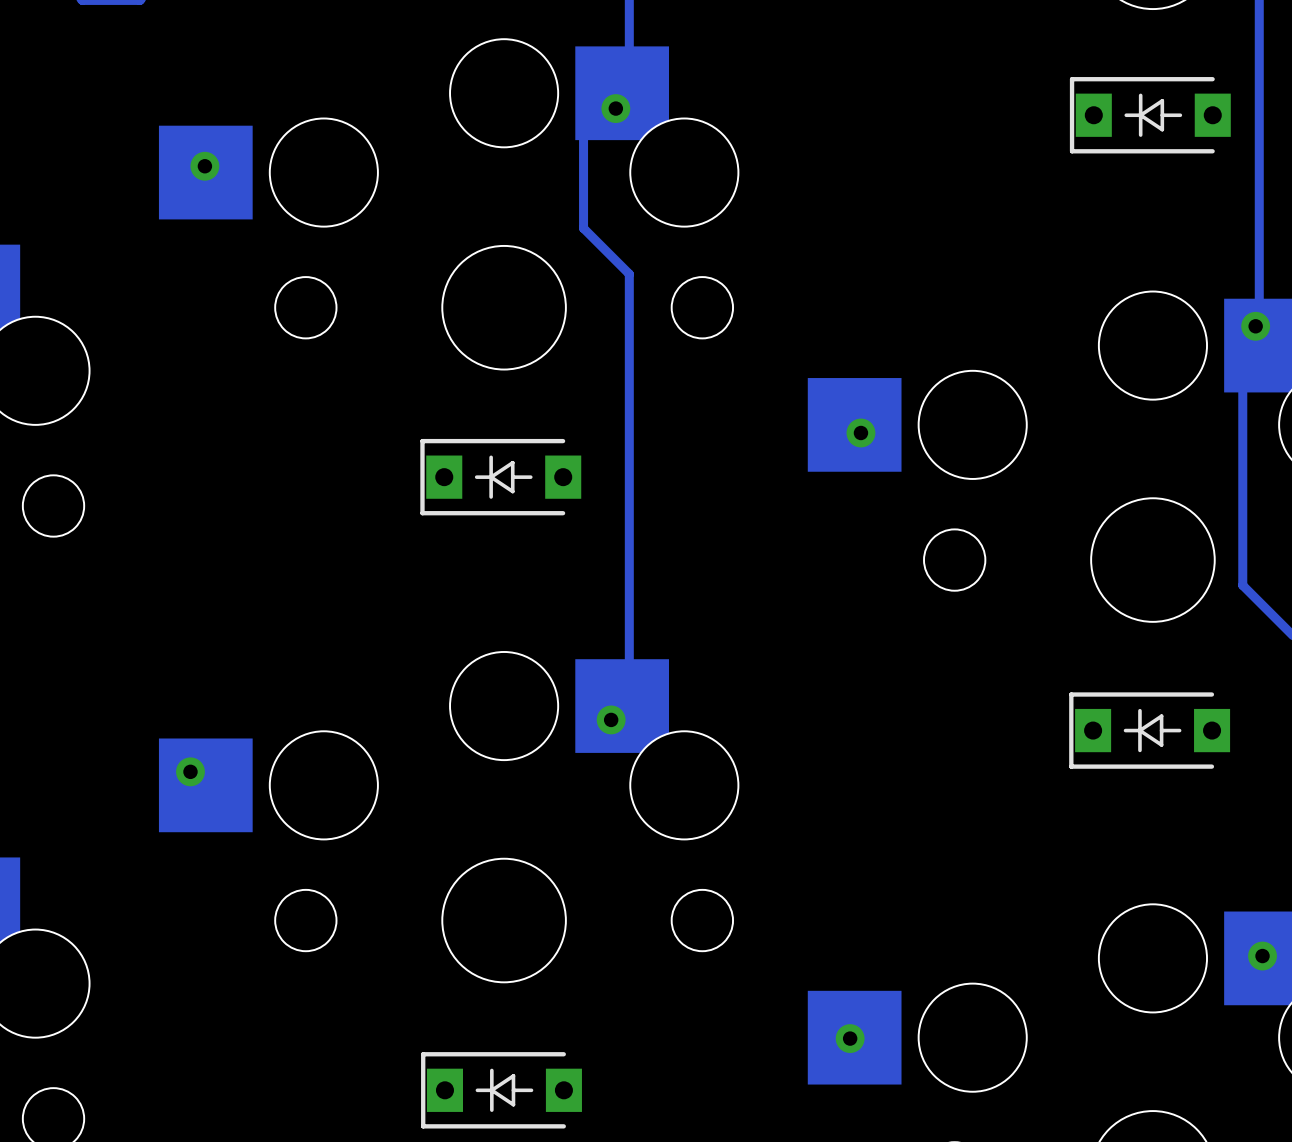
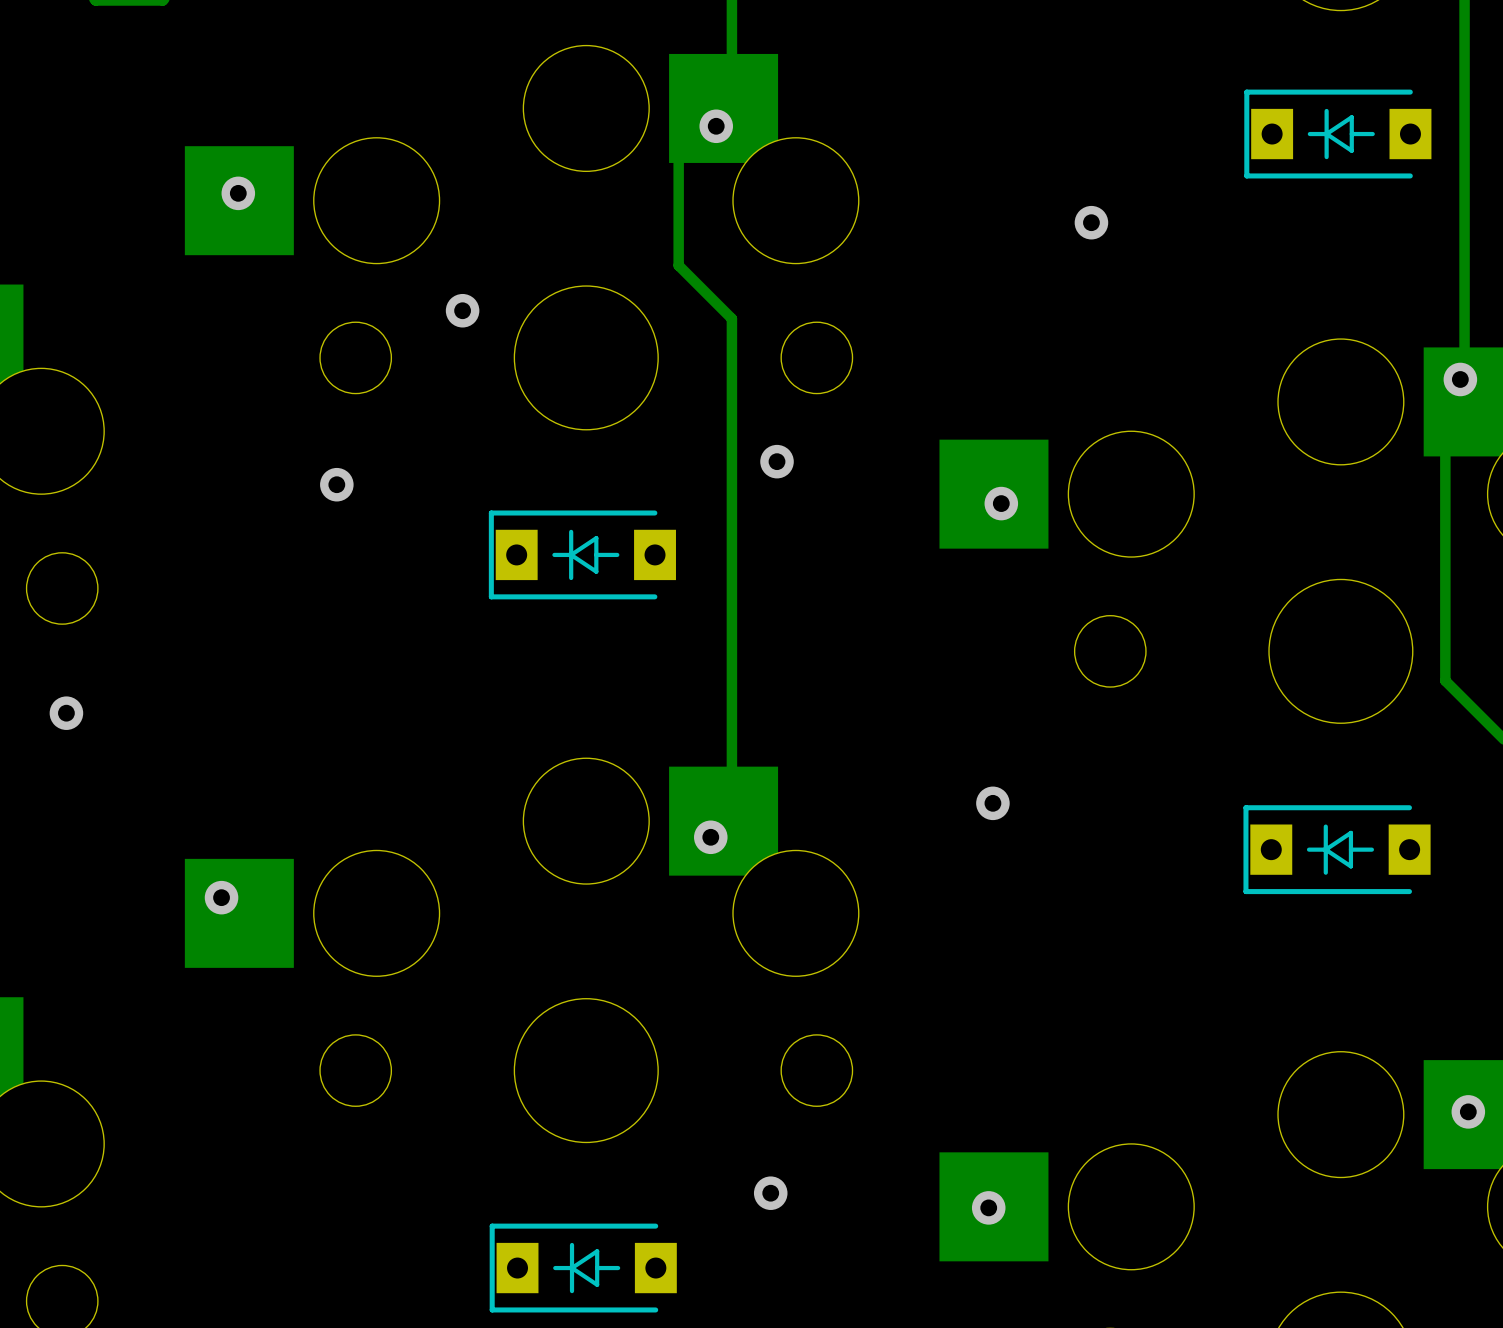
via: none -> (1091, 222)
via: none -> (462, 310)
via: none -> (777, 461)
via: none -> (336, 484)
via: none -> (66, 713)
via: none -> (992, 803)
via: none -> (770, 1193)

